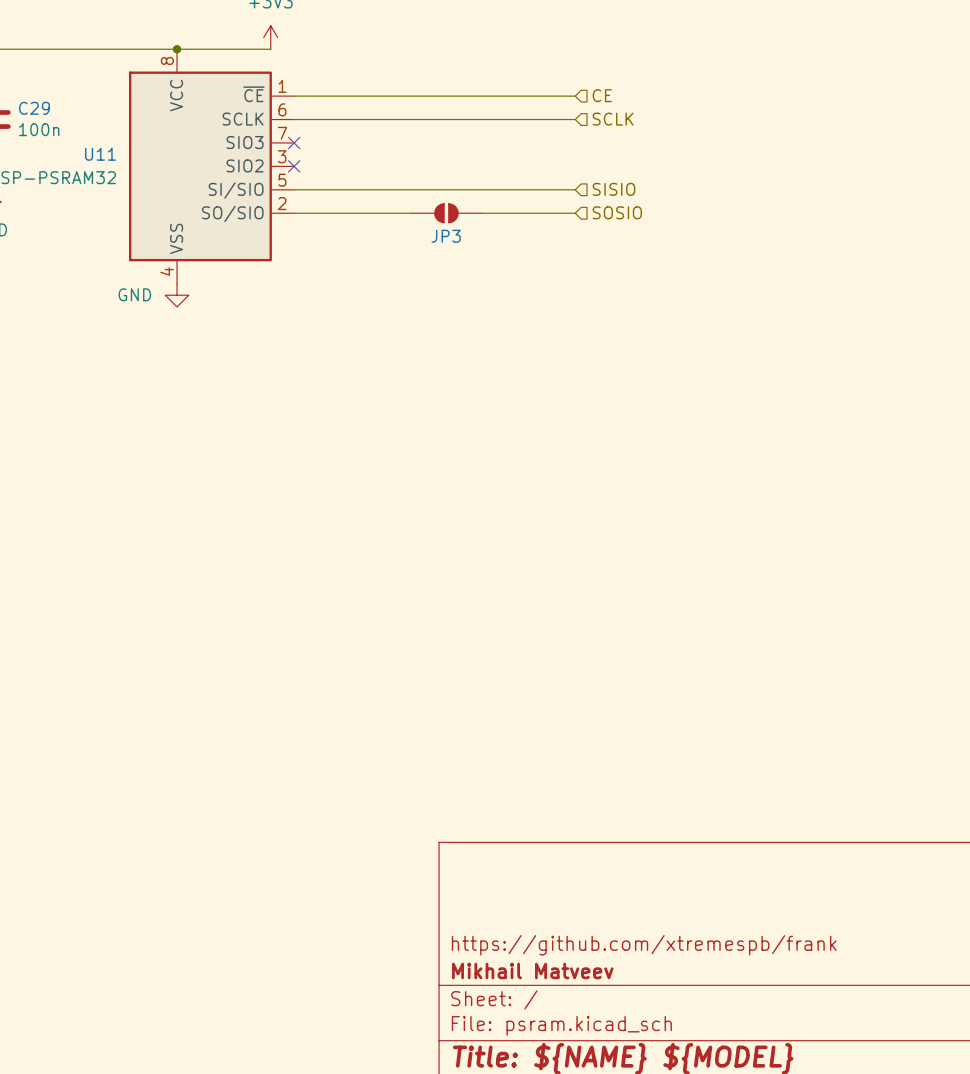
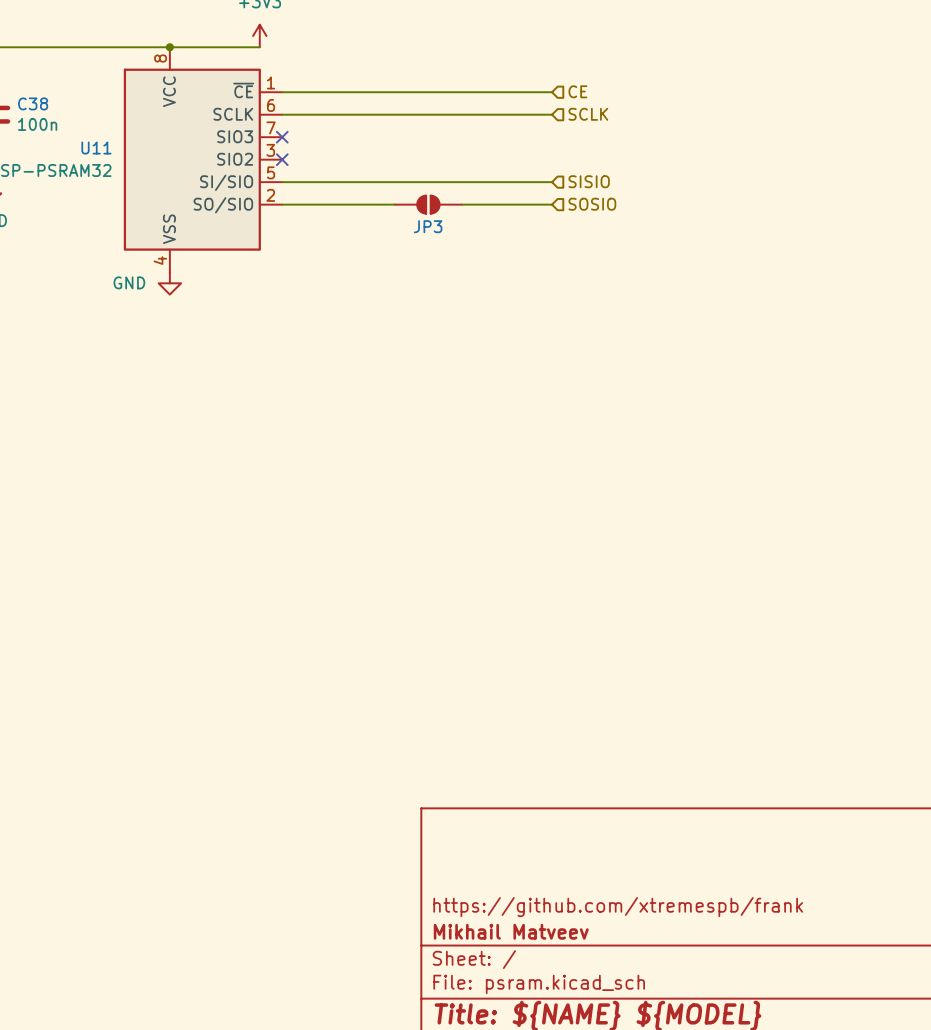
C29 name: C29 (34, 108) -> C38 (33, 103)

